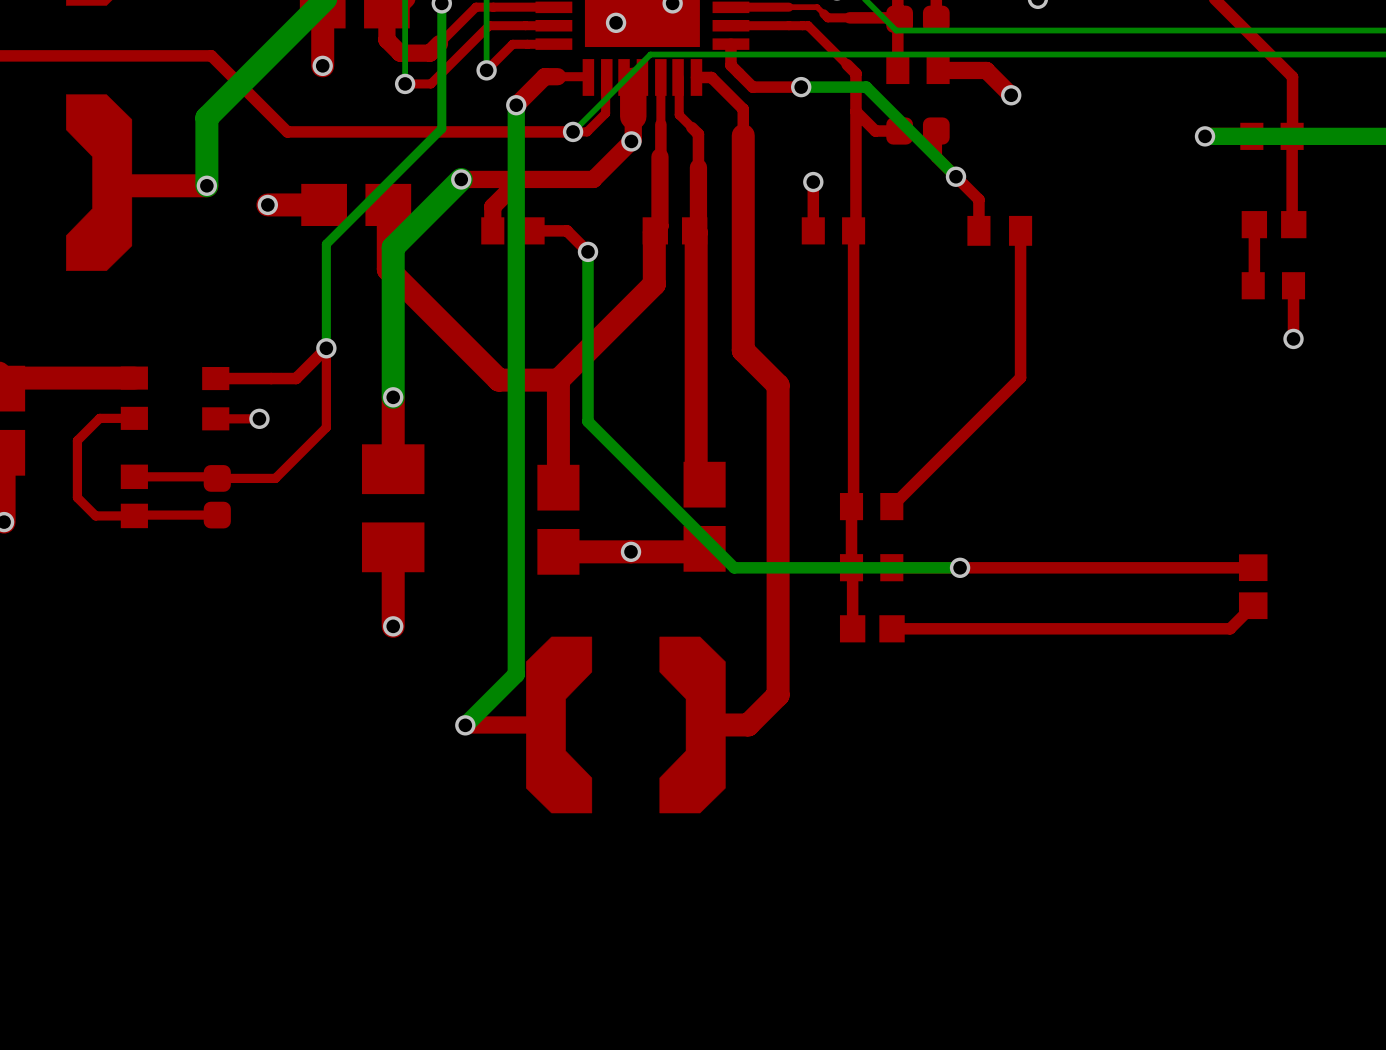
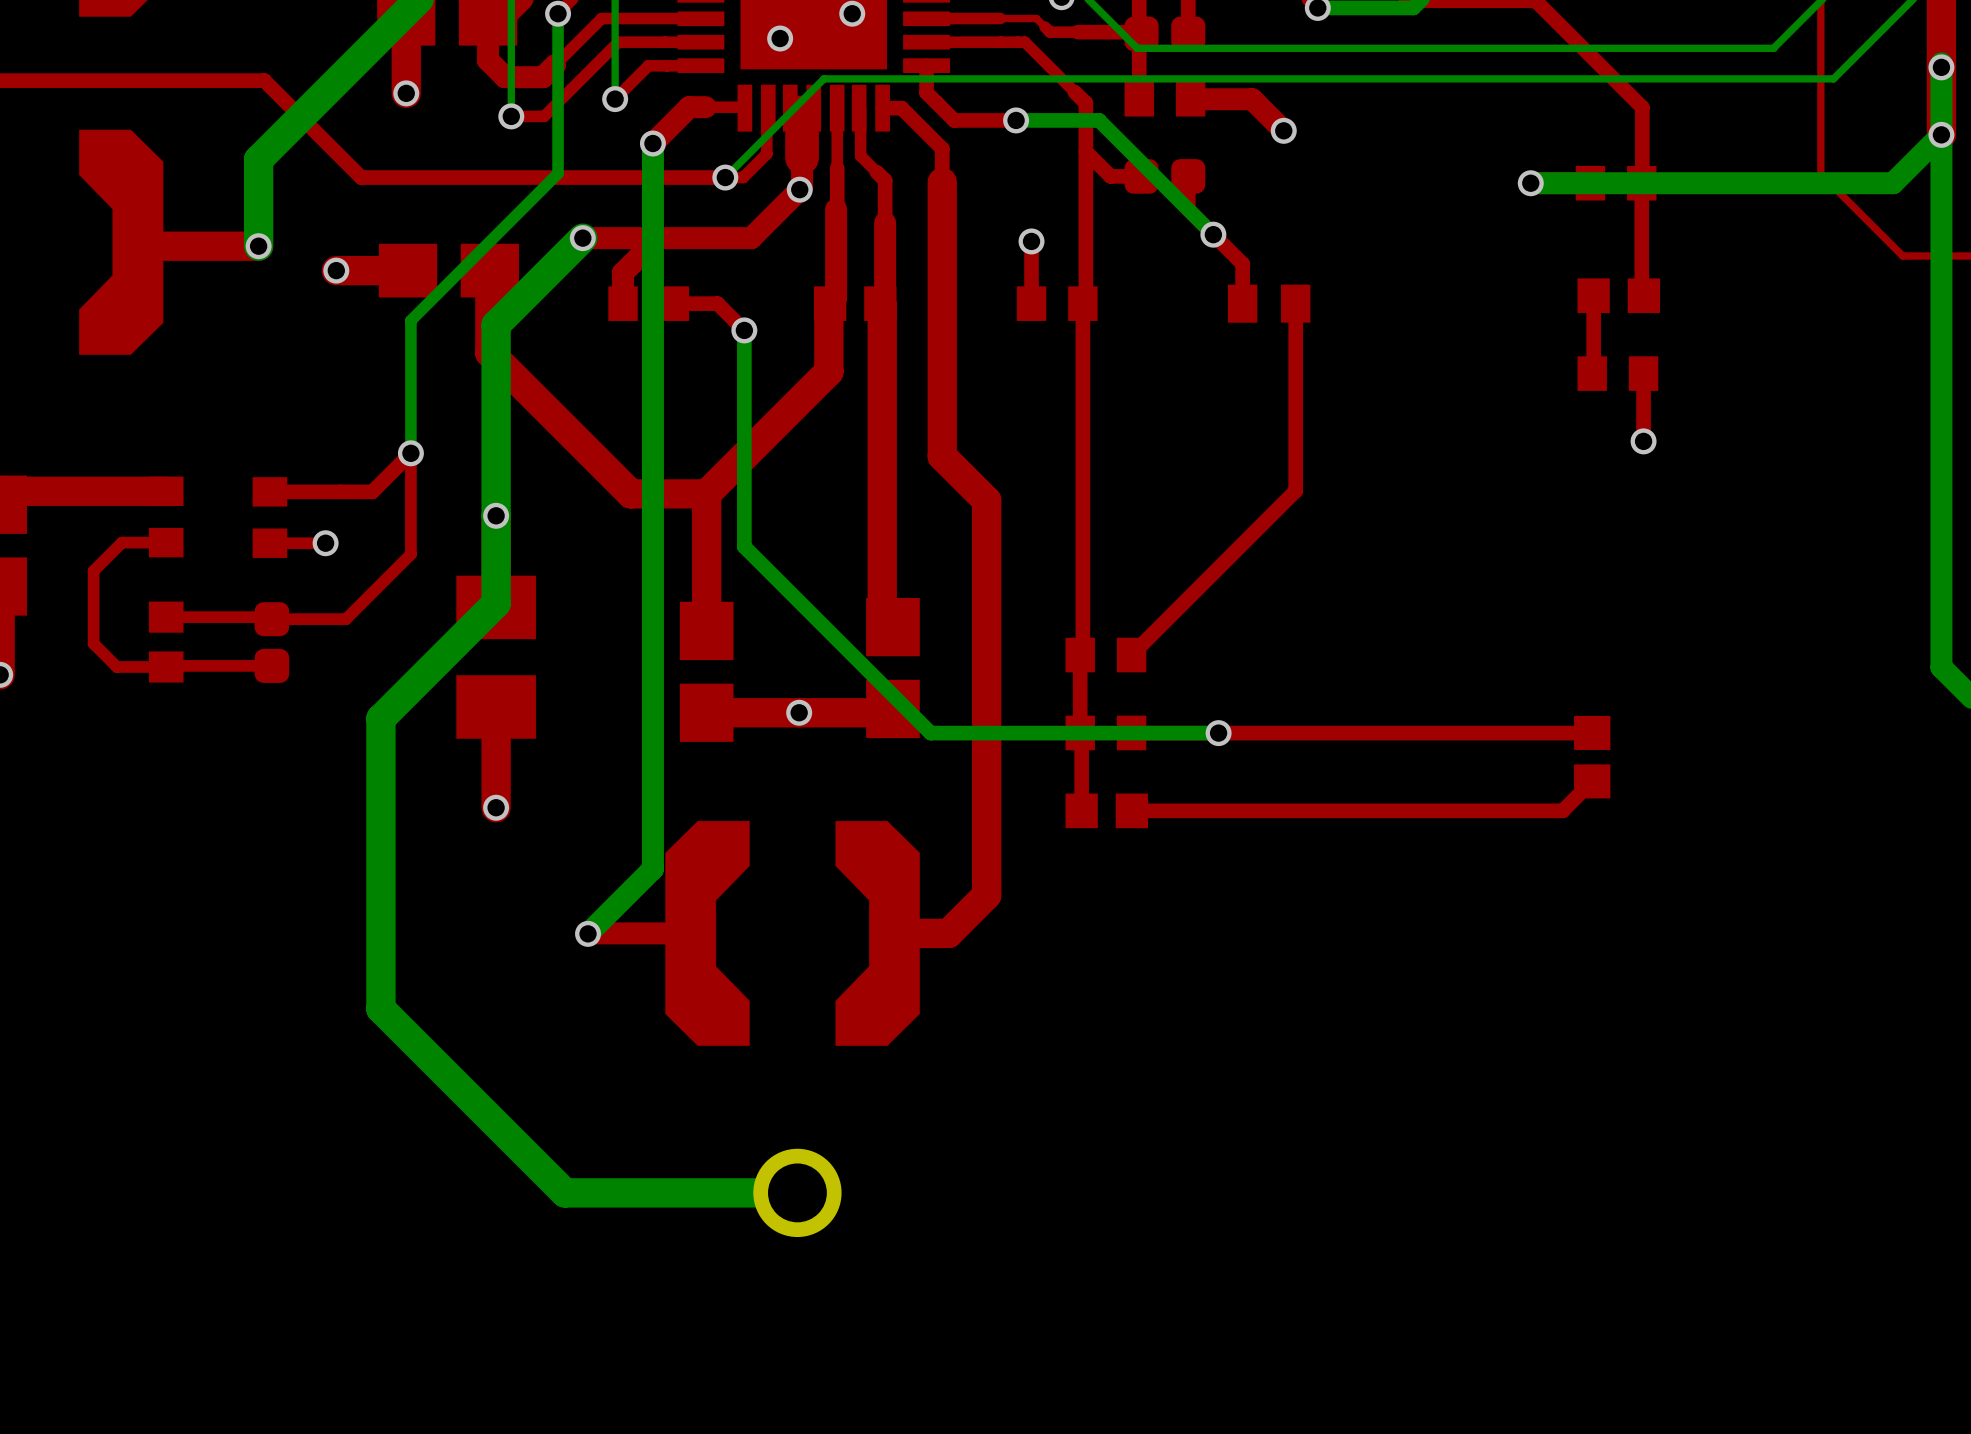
bottom track: none -> (496, 515) (496, 603) (380, 718) (380, 1008) (564, 1192) (797, 1192)
part: none -> (797, 1192)

